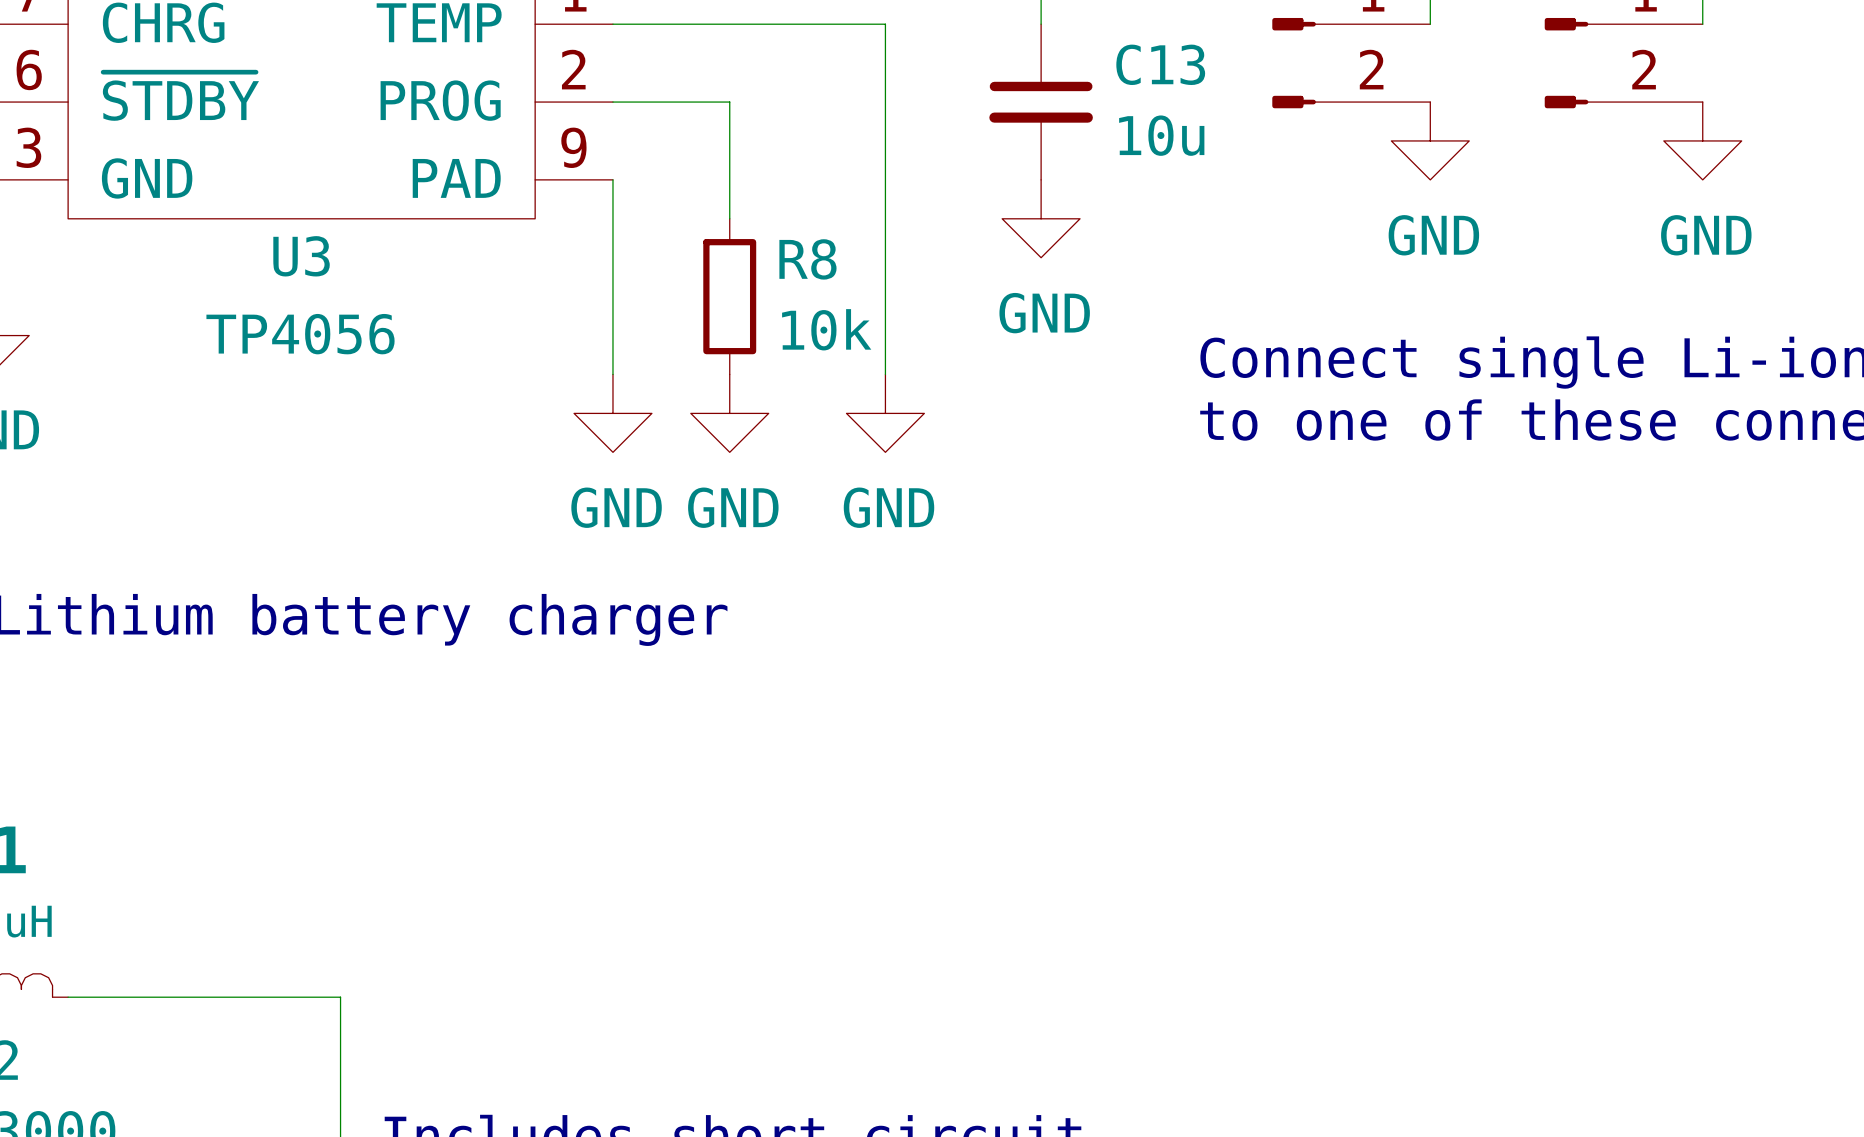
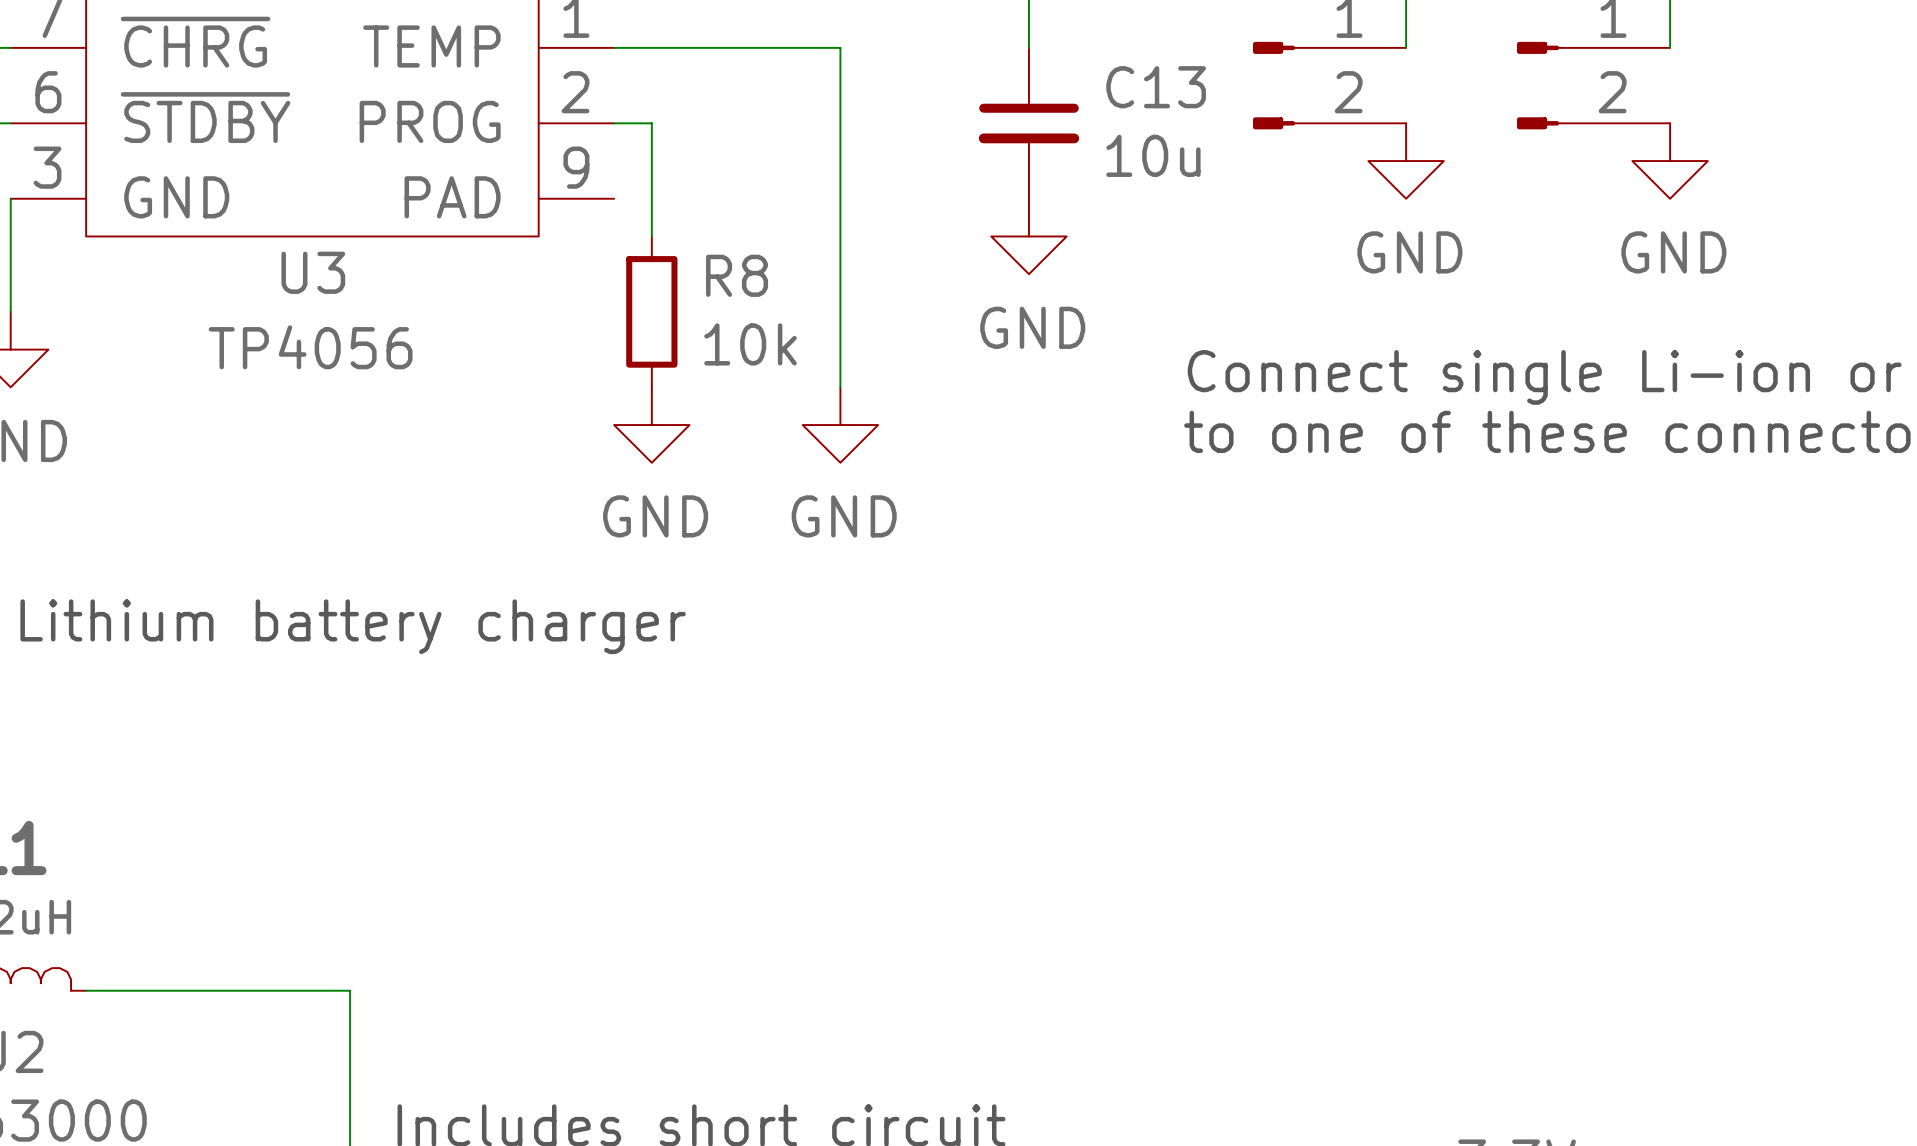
wire: (846, 24) (885, 24) (885, 374) -> (840, 47) (840, 387)
wire: (651, 102) (729, 102) (729, 218) -> (651, 123) (651, 236)
wire: (612, 179) (612, 374) -> none
R8 position: (729, 296) -> (651, 311)
power symbol: GND (612, 413) -> none
power symbol: none -> GND (651, 425)
power symbol: GND (729, 413) -> none
power symbol position: GND (885, 413) -> GND (840, 425)

